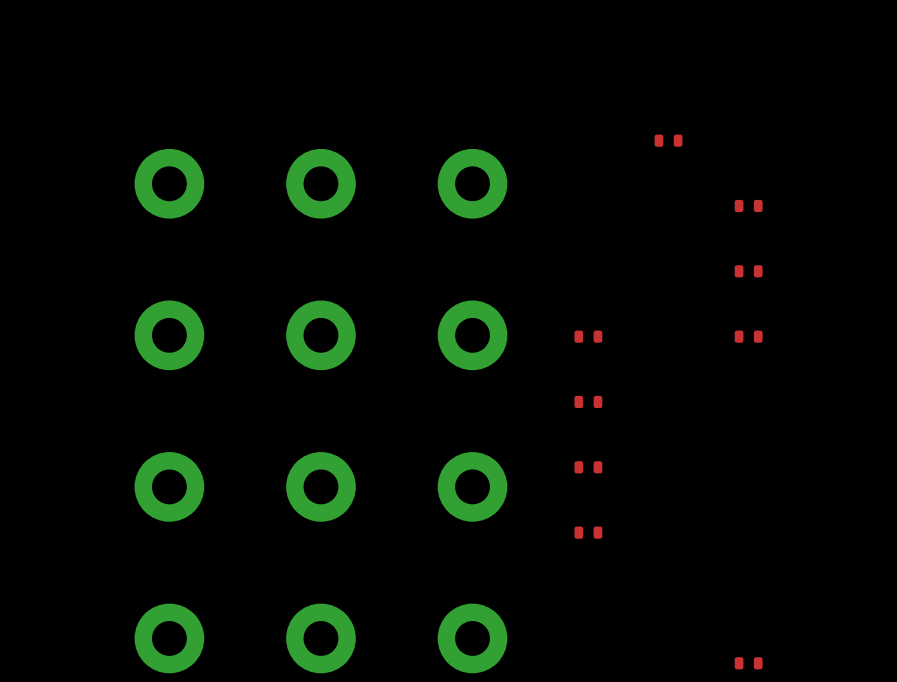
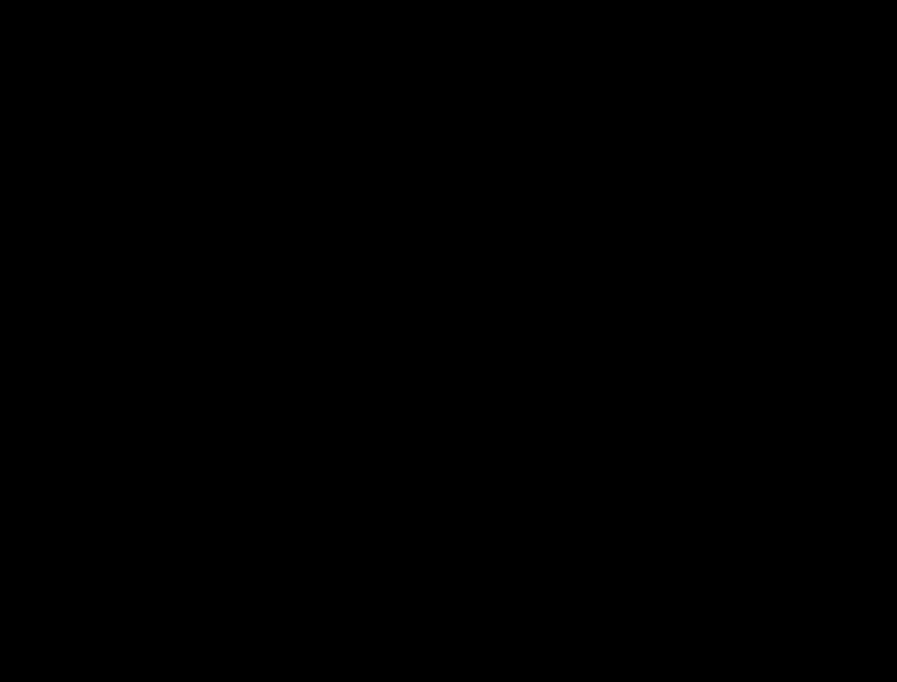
part: (668, 140) -> none
part: (169, 183) -> none
part: (320, 183) -> none
part: (472, 183) -> none
part: (748, 205) -> none
part: (748, 271) -> none
part: (169, 335) -> none
part: (320, 335) -> none
part: (472, 335) -> none
part: (588, 336) -> none
part: (748, 336) -> none
part: (588, 401) -> none
part: (588, 467) -> none
part: (169, 486) -> none
part: (320, 486) -> none
part: (472, 486) -> none
part: (588, 532) -> none
part: (169, 638) -> none
part: (320, 638) -> none
part: (472, 638) -> none
part: (748, 663) -> none

